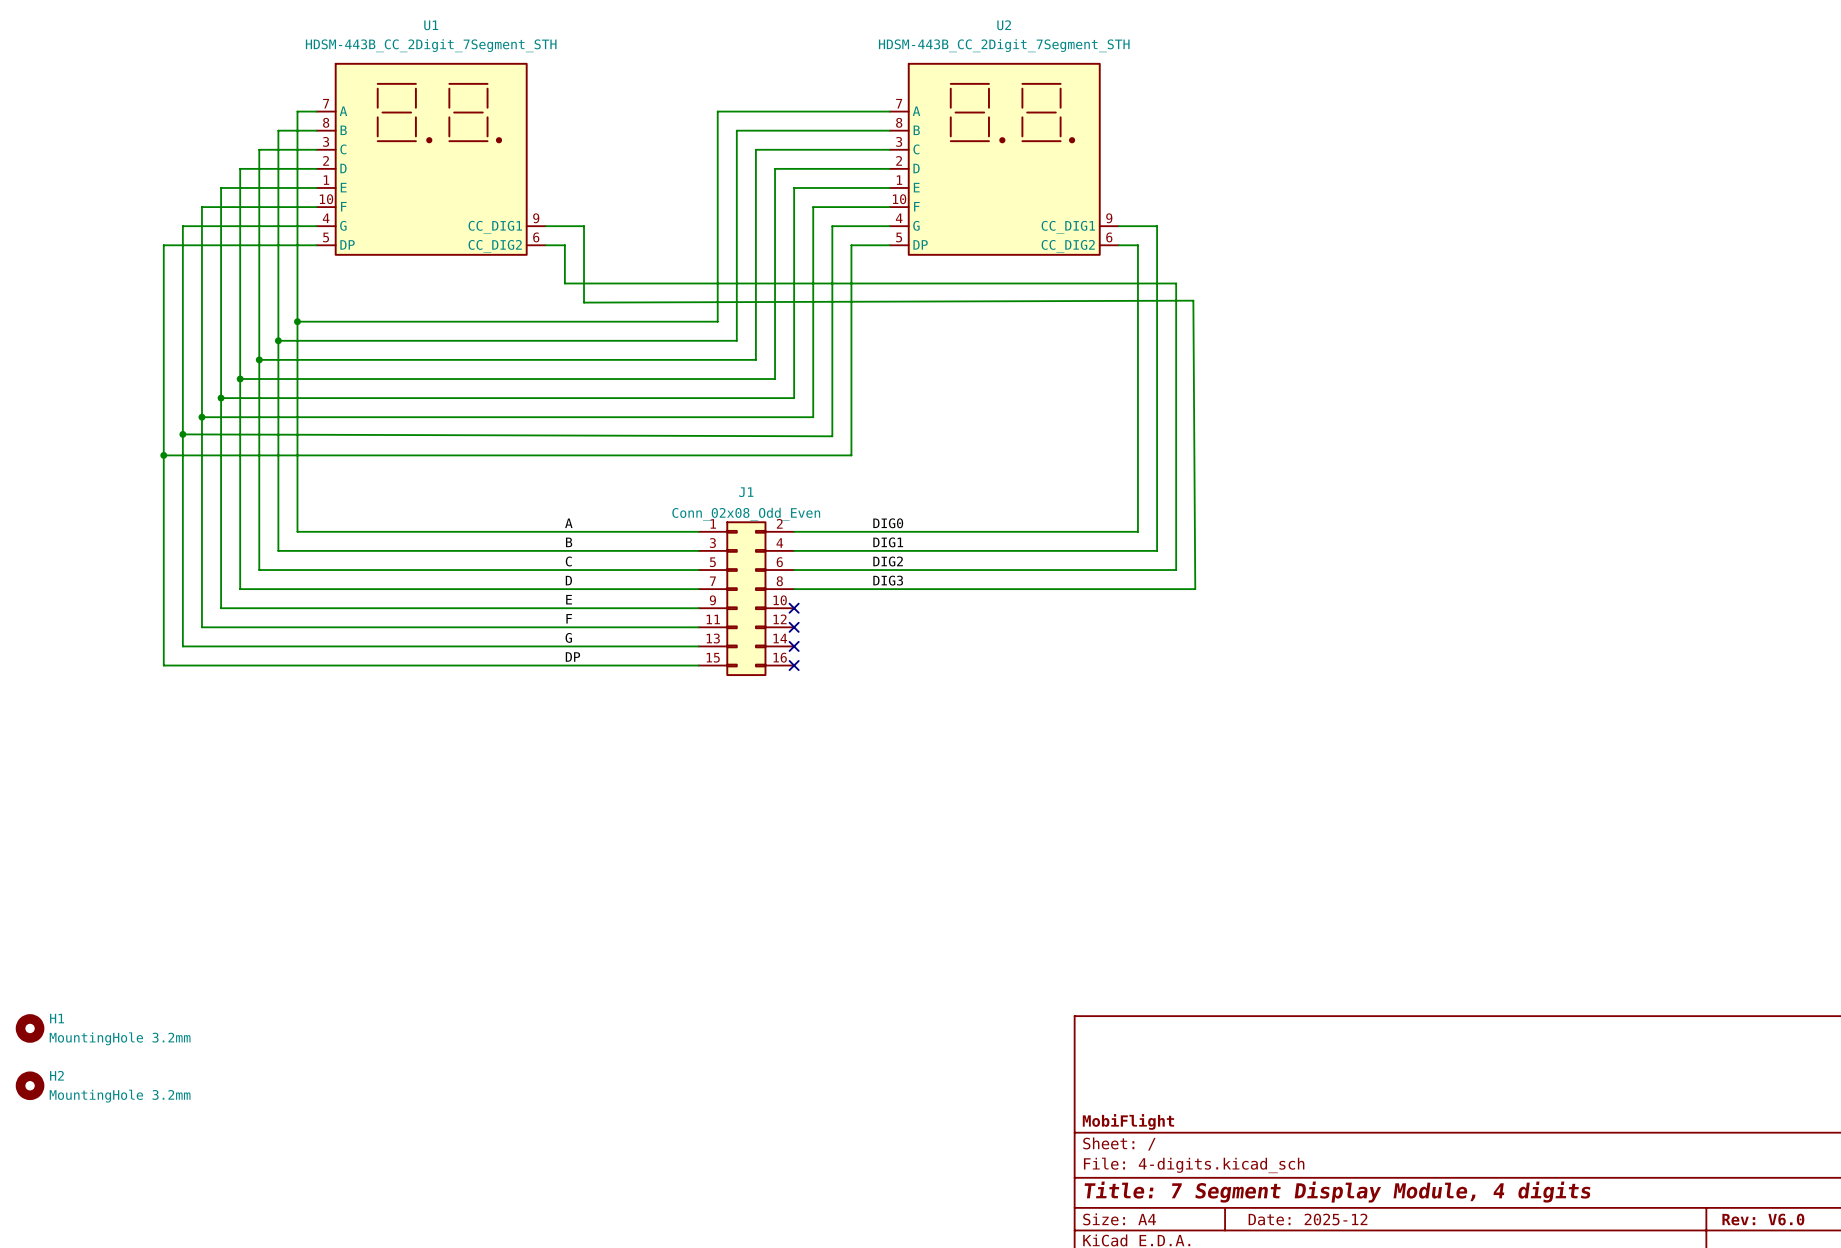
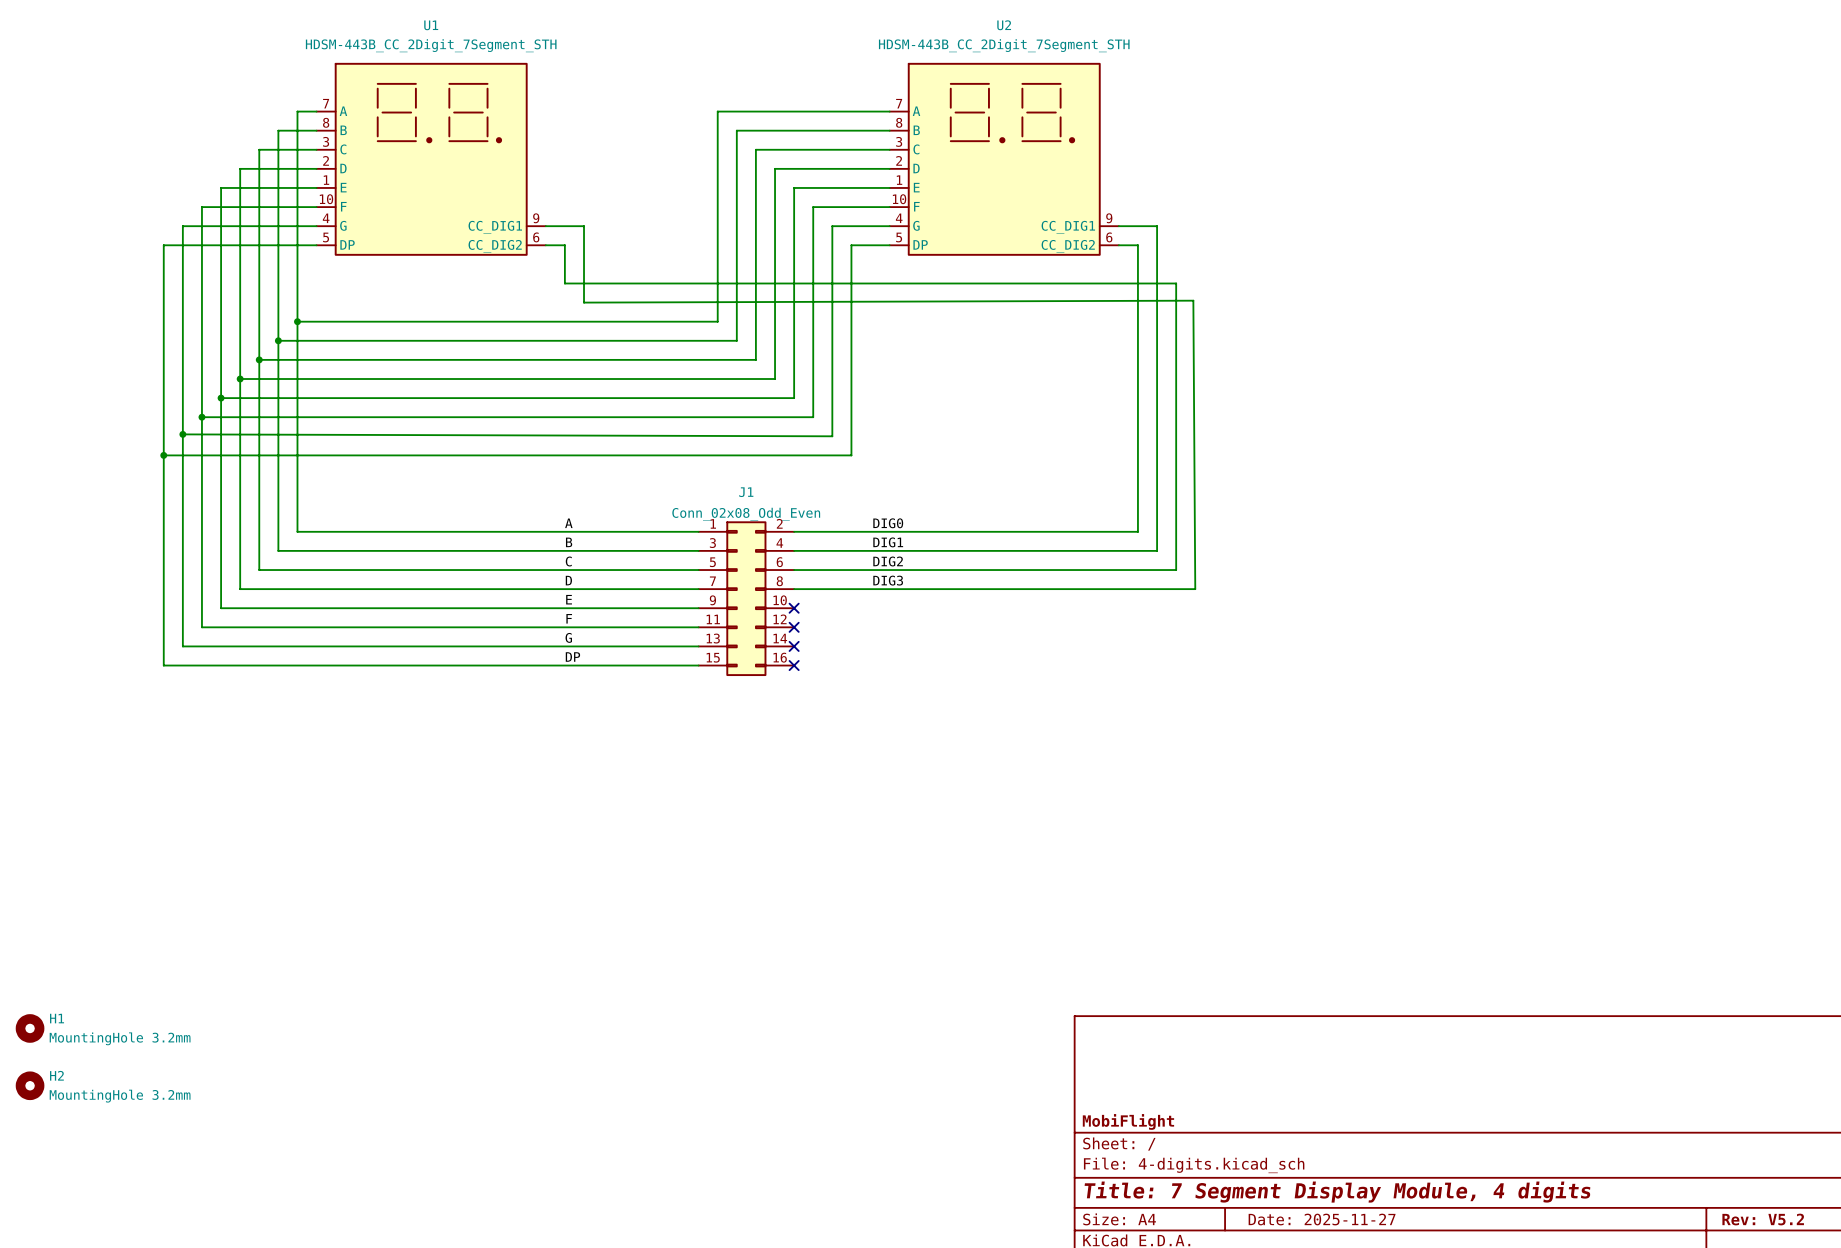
title block: Date: 2025-12 (1308, 1219) -> Date: 2025-11-27 (1322, 1219)
title block: Rev: V6.0 (1763, 1219) -> Rev: V5.2 (1763, 1219)

